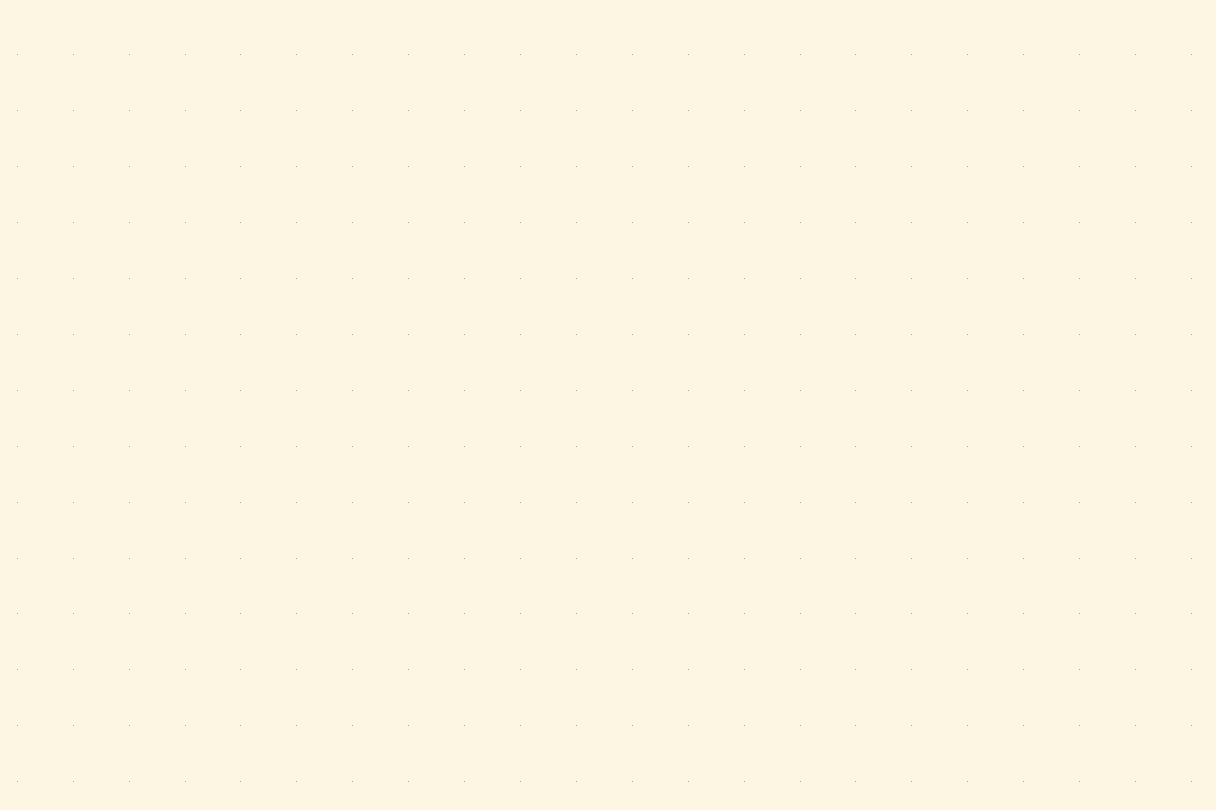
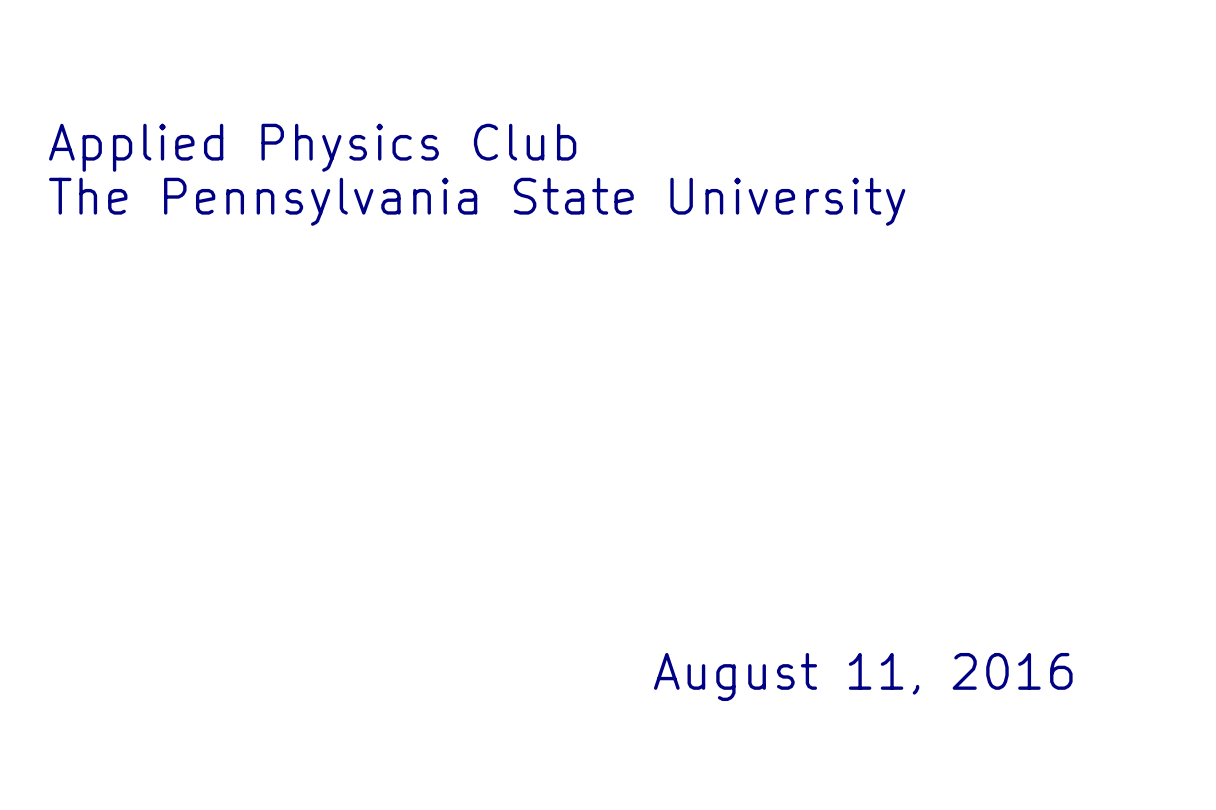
text: none -> Applied Physics Club (312, 147)
text: none -> The Pennsylvania State University (477, 201)
text: none -> August 11, 2016 (863, 676)

